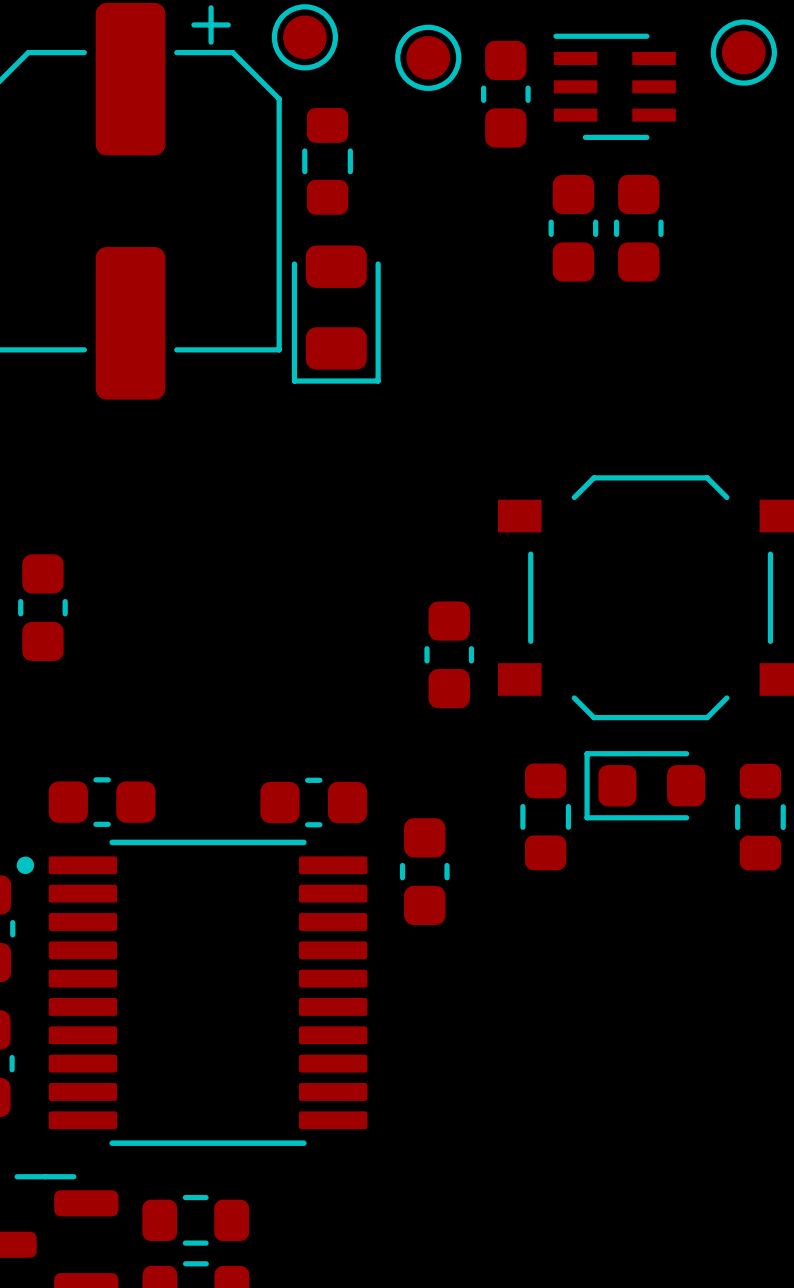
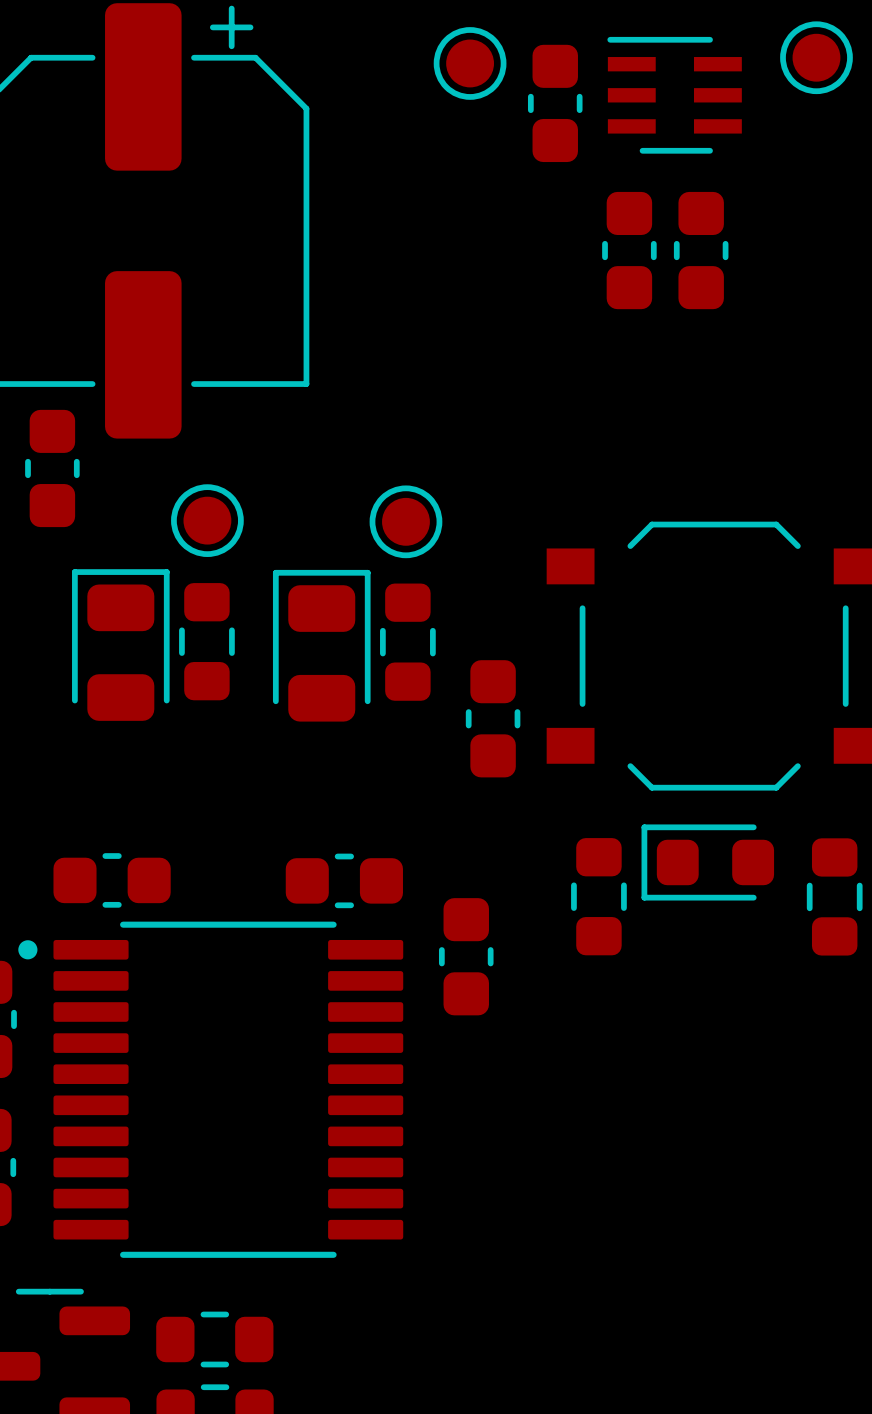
part: (304, 37) -> none
part: (327, 161) -> none
part: (336, 314) -> none
part: none -> (207, 520)
part: none -> (405, 521)
part: none -> (206, 641)
part: none -> (407, 642)
part: none -> (120, 645)
part: none -> (321, 645)
part position: (42, 607) -> (52, 468)

